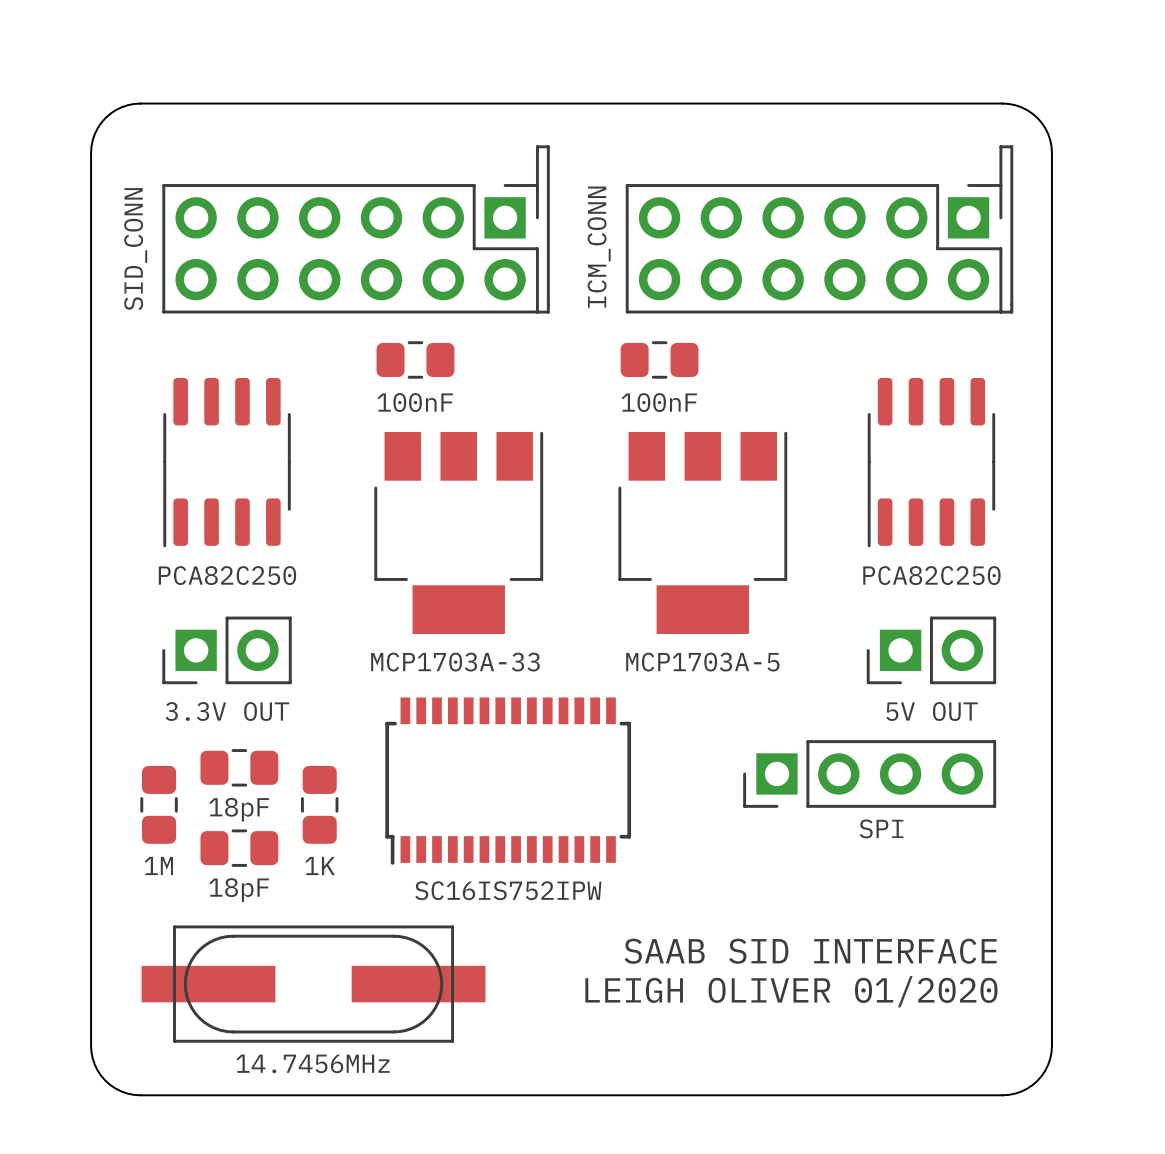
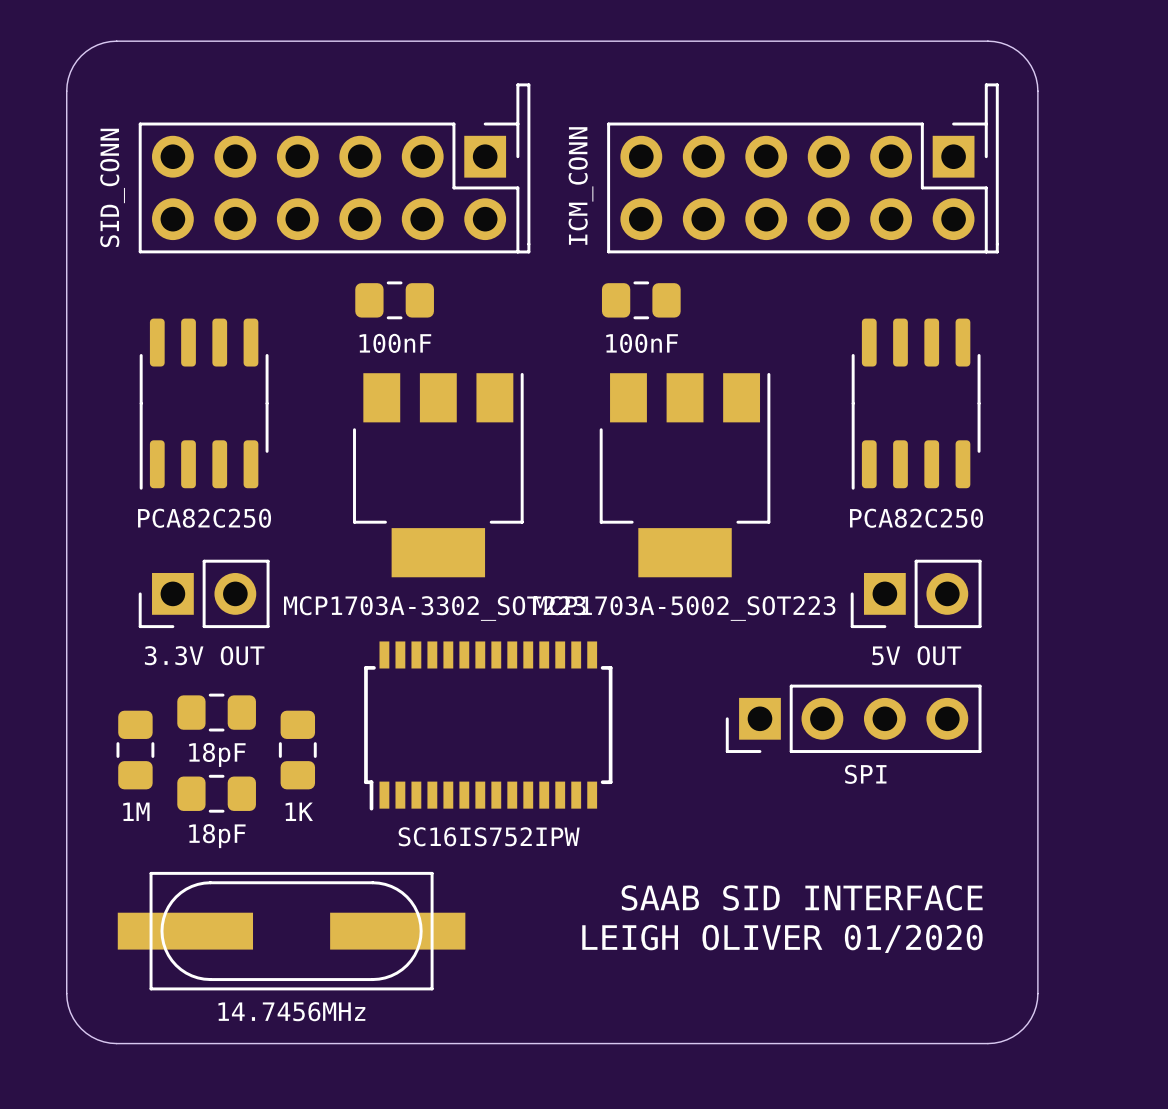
part value: MCP1703A-33 (455, 662) -> MCP1703A-3302_SOT223 (434, 608)
part value: MCP1703A-5 (702, 662) -> MCP1703A-5002_SOT223 (684, 608)

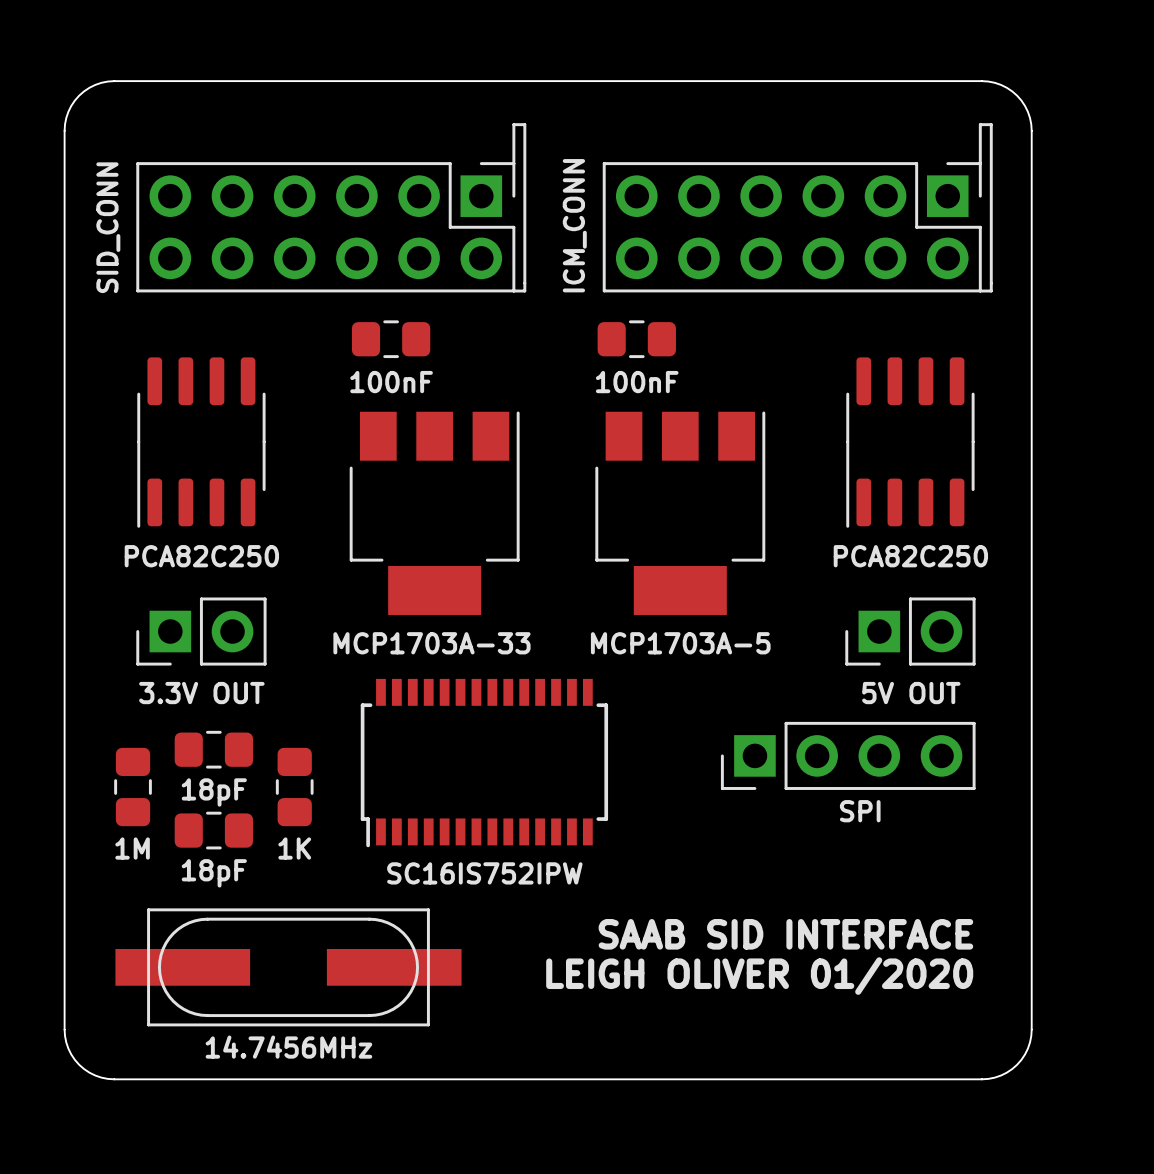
part value: MCP1703A-3302_SOT223 (434, 608) -> MCP1703A-33 (431, 643)
part value: MCP1703A-5002_SOT223 (684, 608) -> MCP1703A-5 (680, 643)

